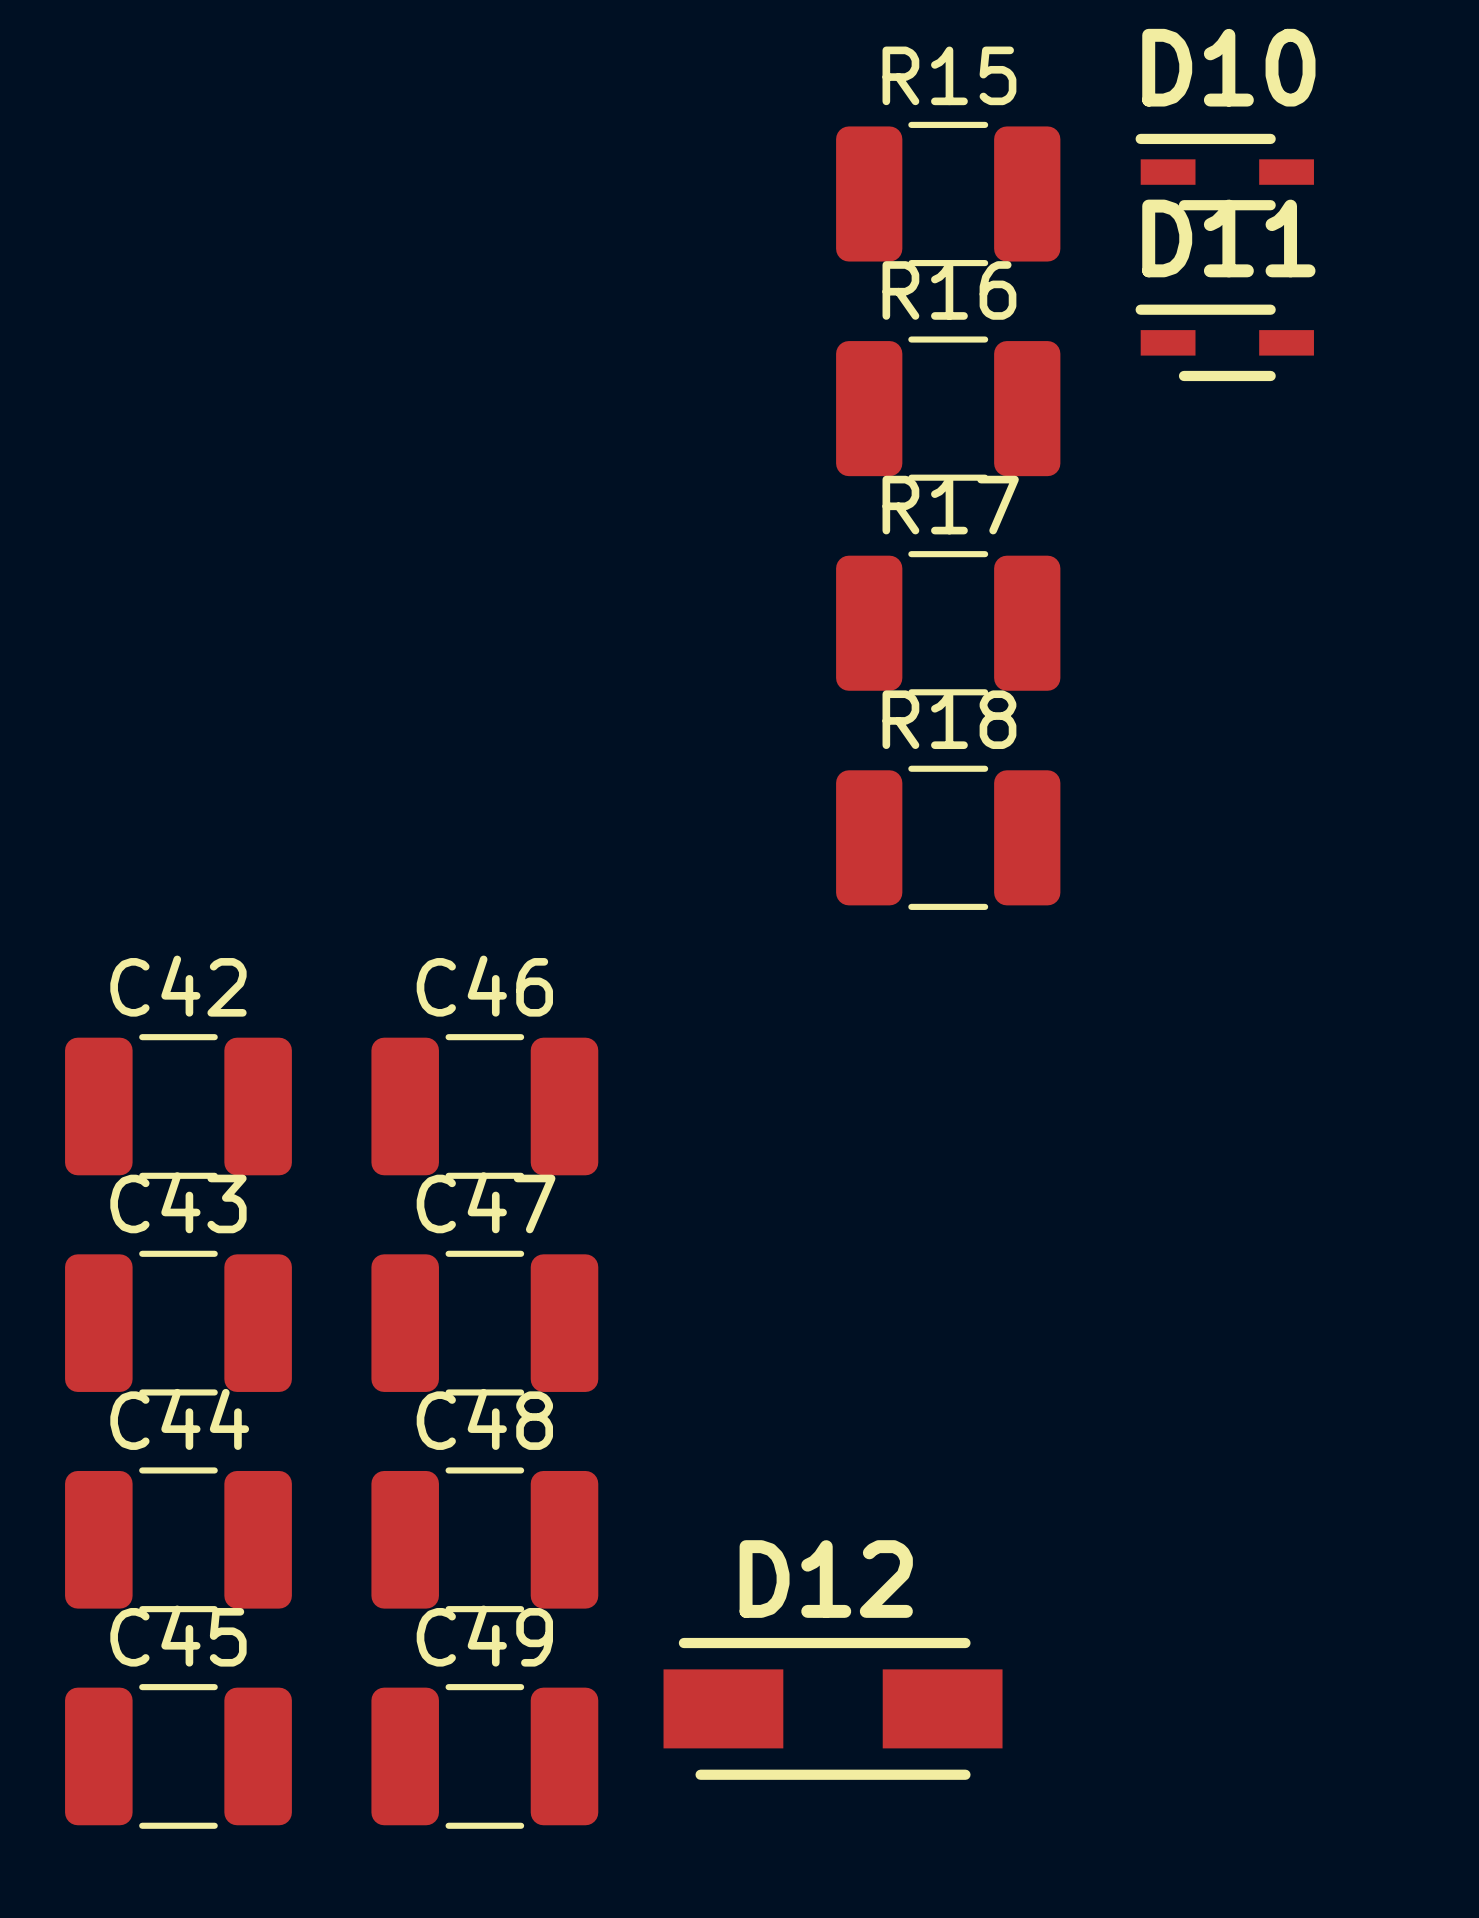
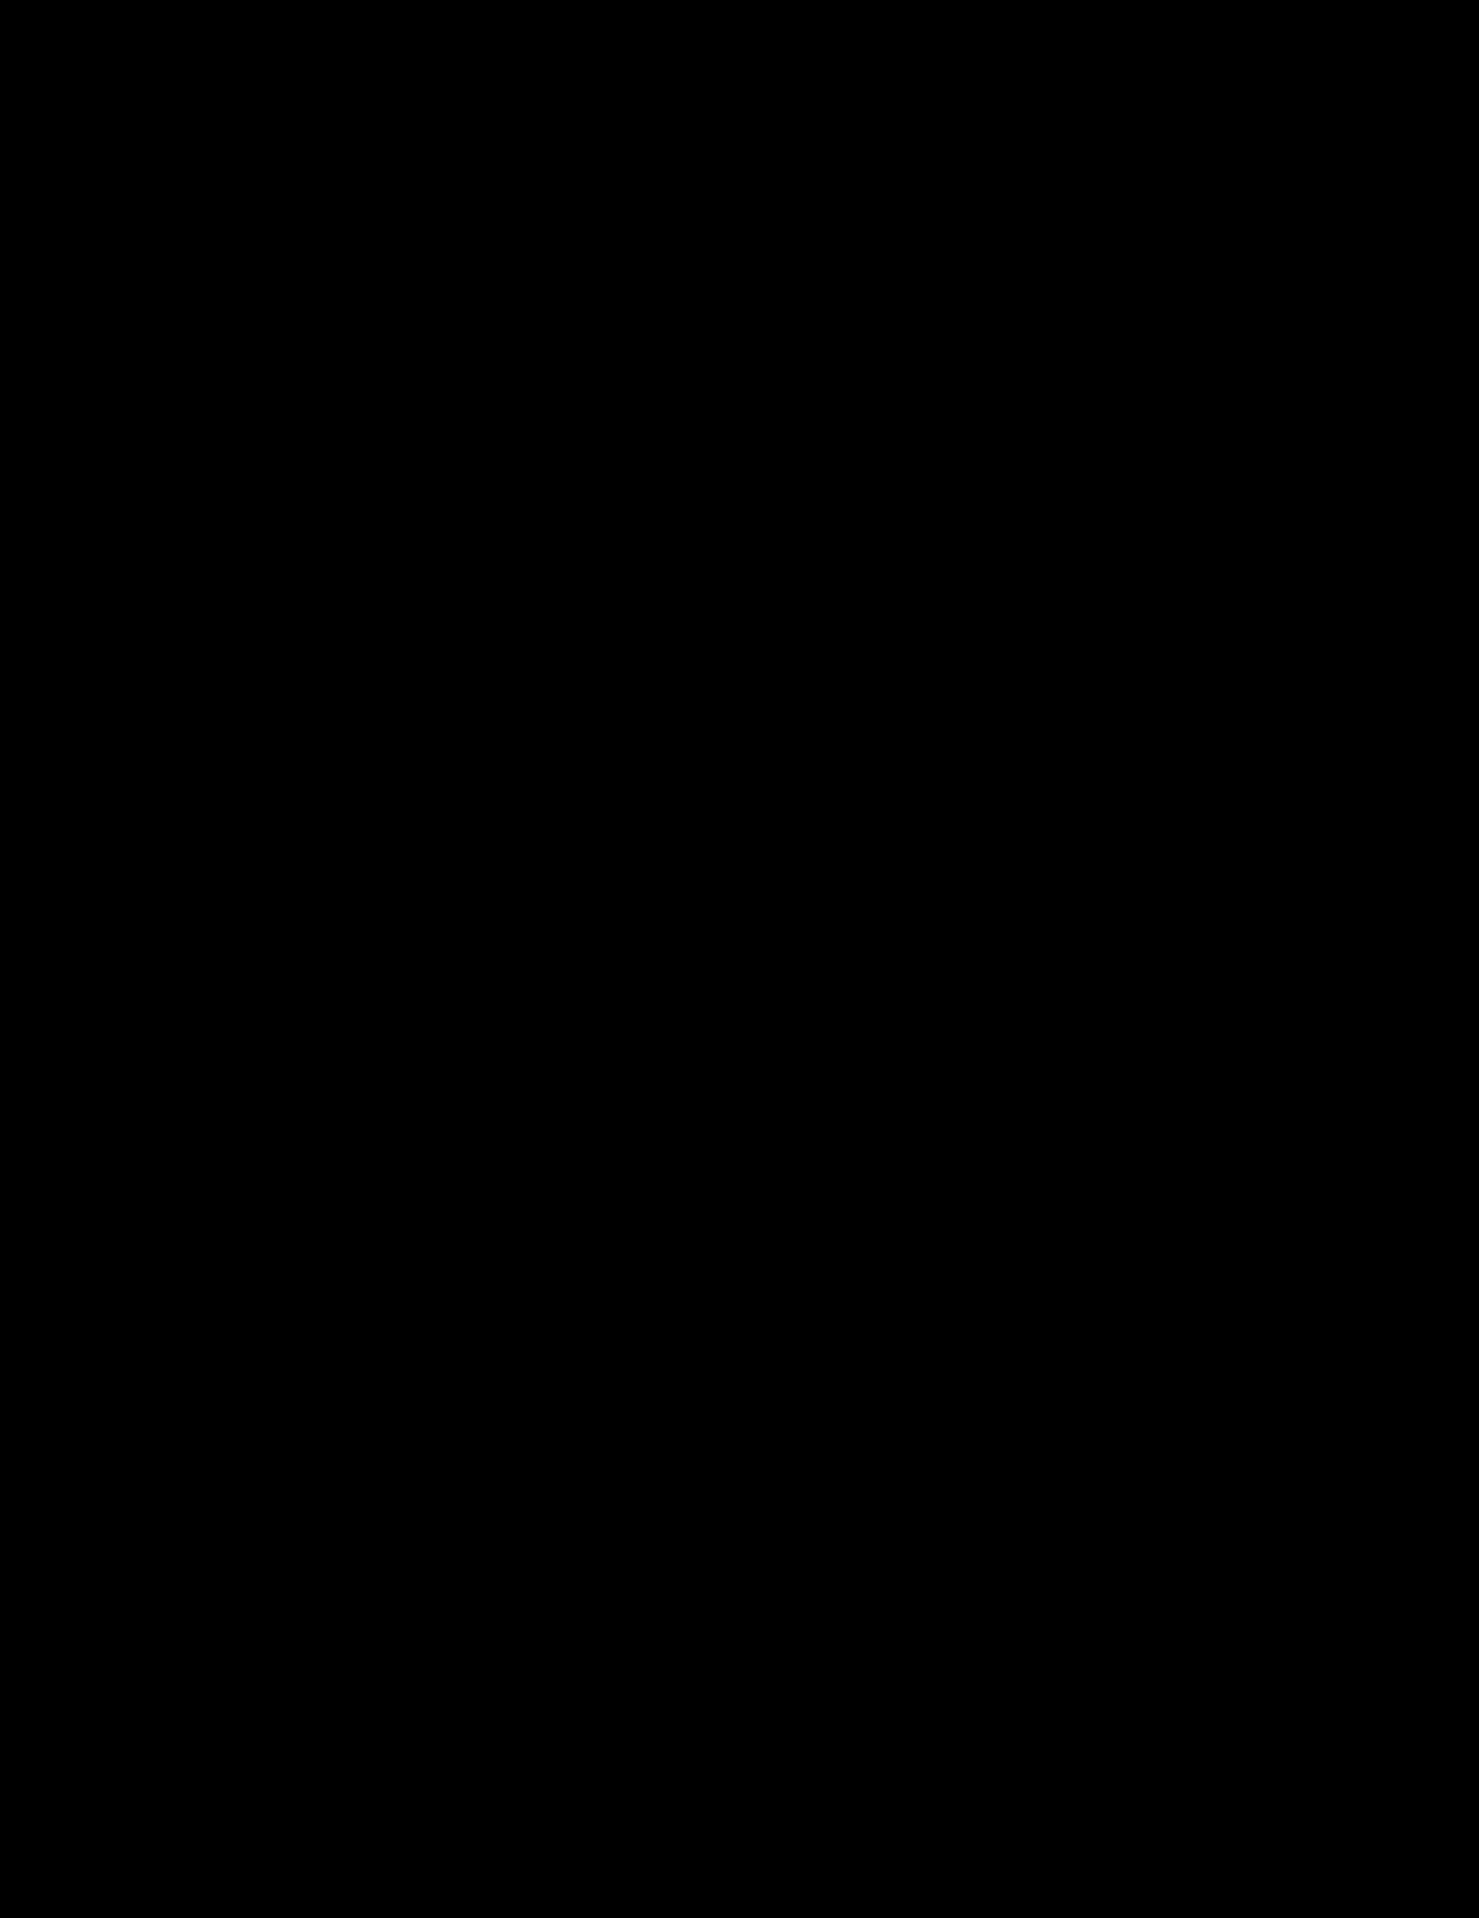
D10: (1224, 172) -> none
R15: (948, 193) -> none
D11: (1224, 342) -> none
R16: (948, 408) -> none
R17: (948, 623) -> none
R18: (948, 837) -> none
C42: (178, 1106) -> none
C46: (484, 1106) -> none
C43: (178, 1323) -> none
C47: (484, 1323) -> none
C44: (178, 1539) -> none
C48: (484, 1539) -> none
D12: (833, 1708) -> none
C45: (178, 1756) -> none
C49: (484, 1756) -> none

